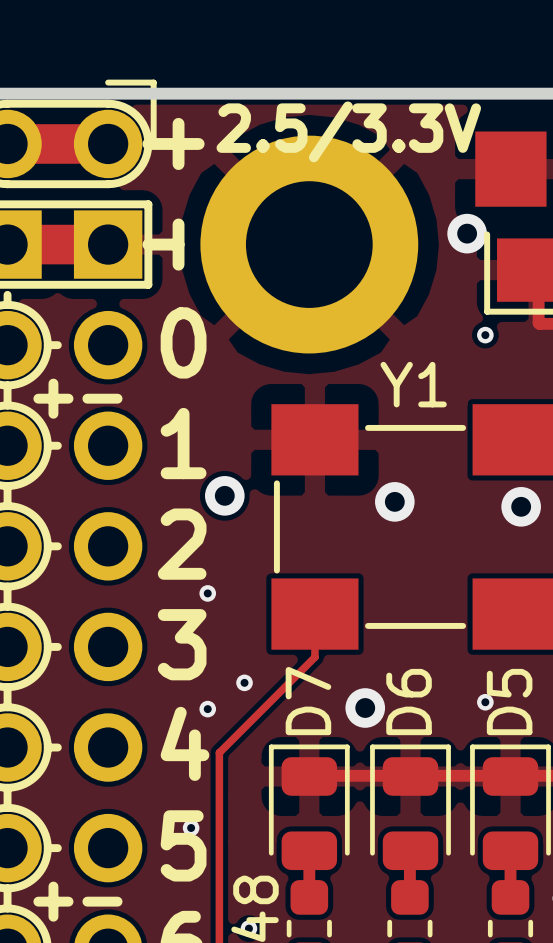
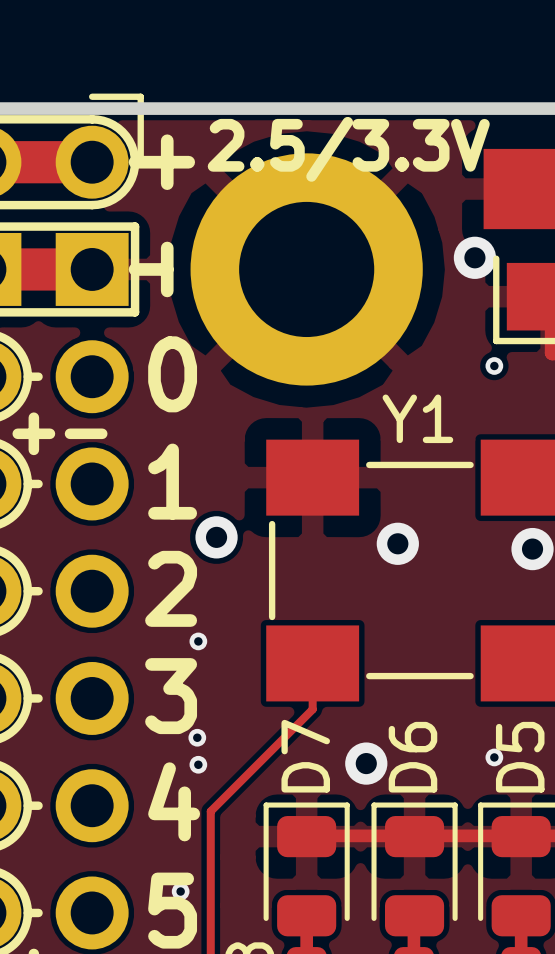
via position: (244, 682) -> (197, 737)

